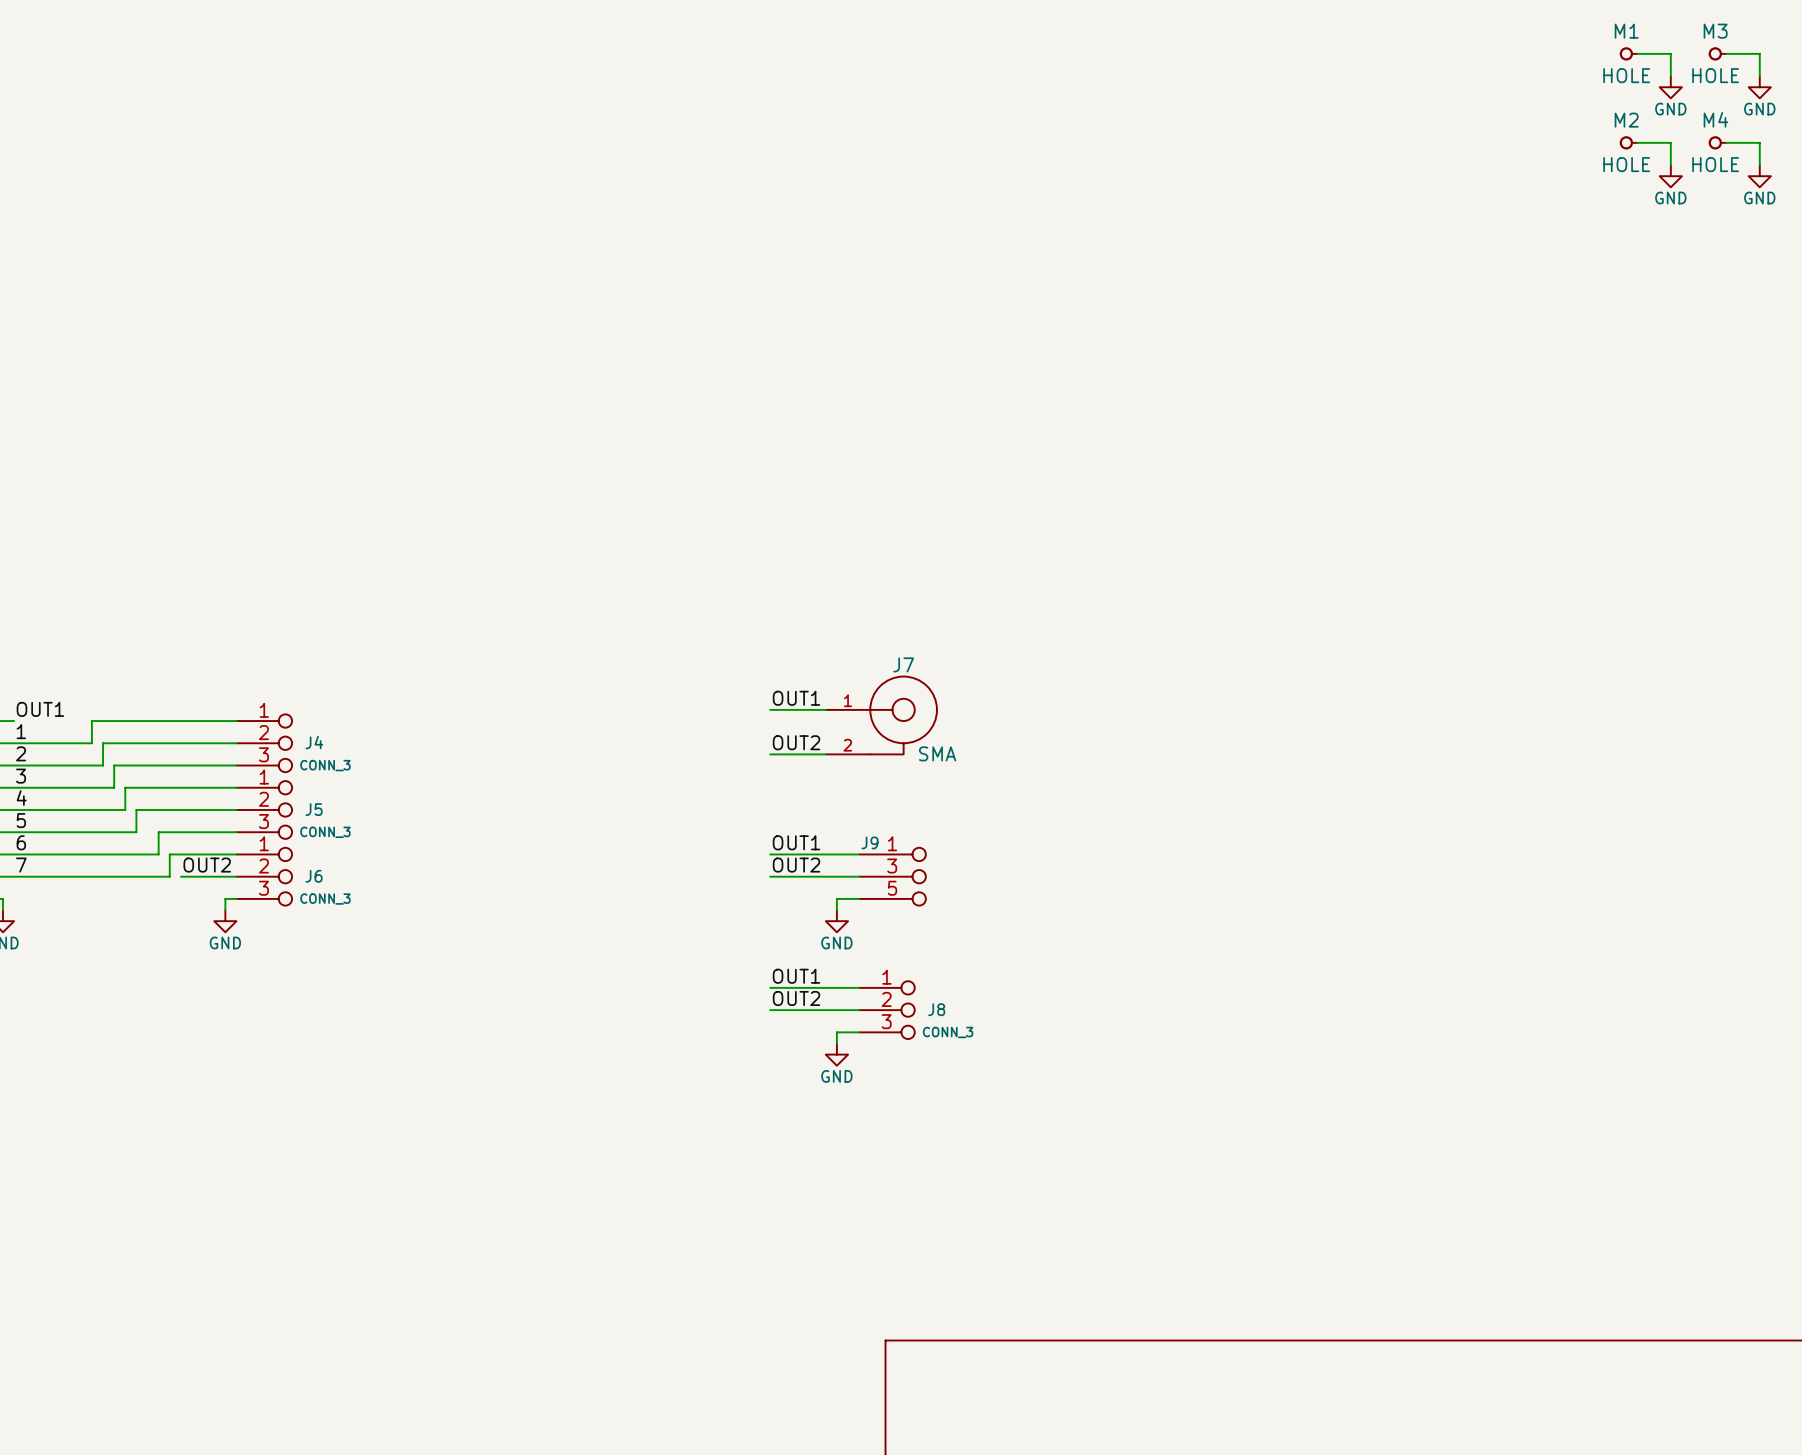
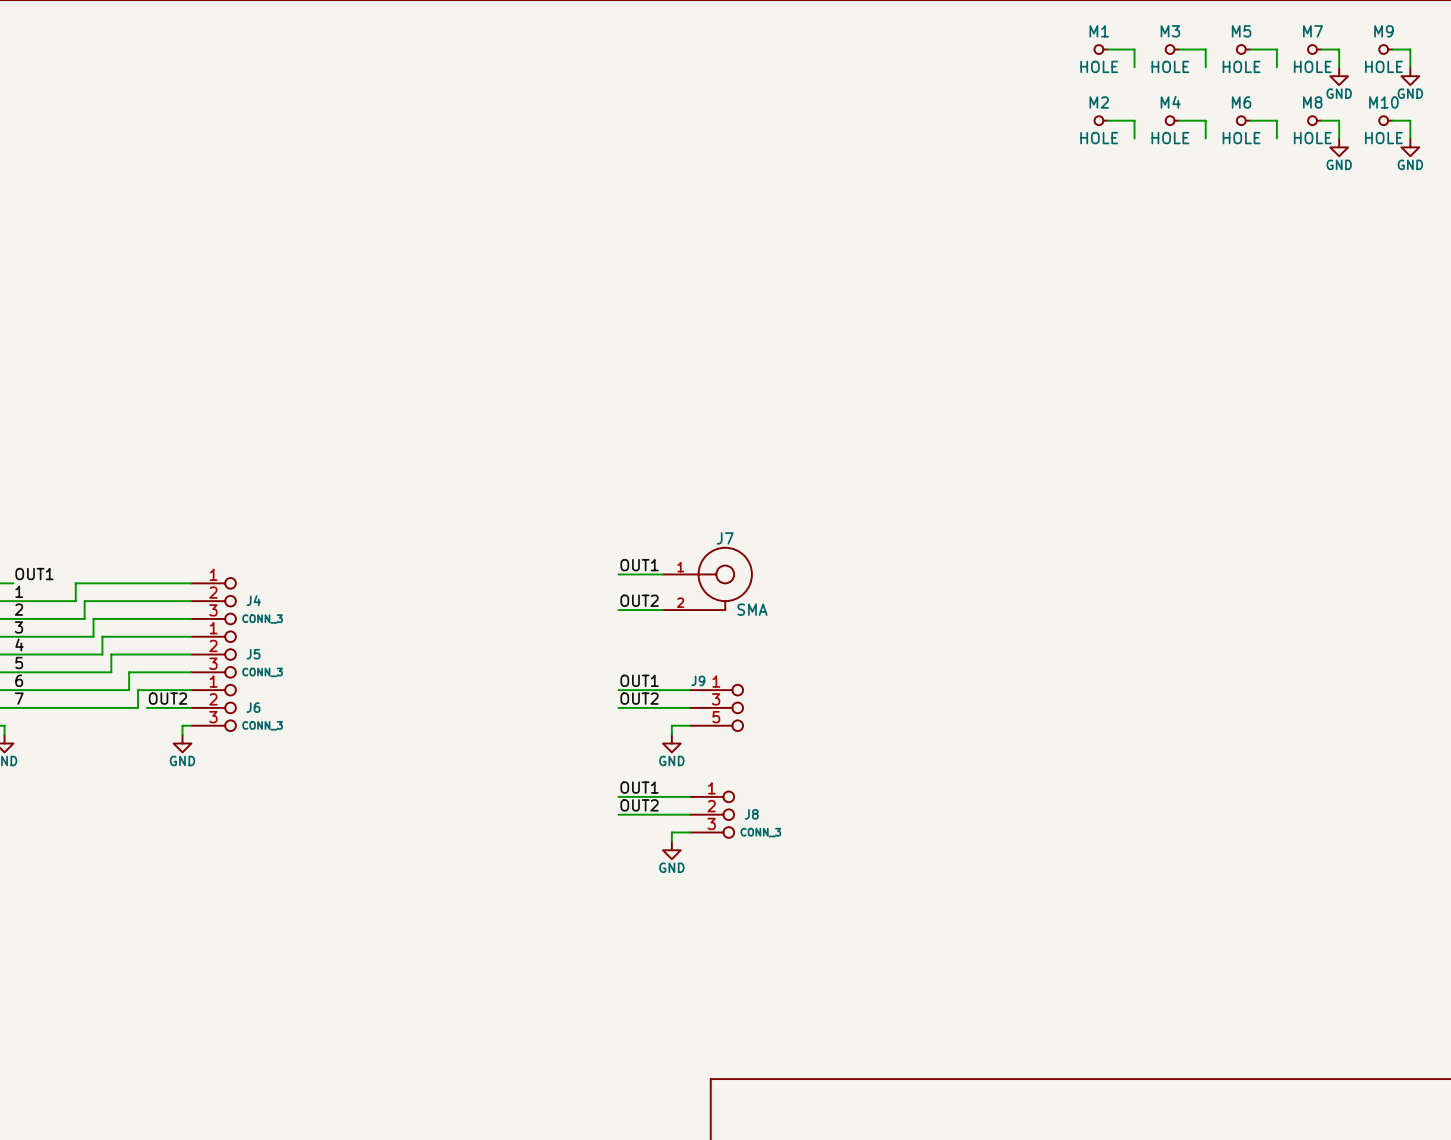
wire: none -> (1107, 49) (1134, 49) (1134, 67)
wire: none -> (1179, 49) (1205, 49) (1205, 67)
M5: none -> HOLE (1243, 49)
wire: none -> (1250, 49) (1276, 49) (1276, 67)
M1 position: (1628, 53) -> (1100, 49)
M7: none -> HOLE (1314, 49)
M3 position: (1717, 53) -> (1171, 49)
M9: none -> HOLE (1385, 49)
wire: none -> (1107, 120) (1134, 120) (1134, 138)
wire: none -> (1179, 120) (1205, 120) (1205, 138)
M6: none -> HOLE (1243, 120)
wire: none -> (1250, 120) (1276, 120) (1276, 138)
M2 position: (1628, 142) -> (1100, 120)
M8: none -> HOLE (1314, 120)
M4 position: (1717, 142) -> (1171, 120)
M10: none -> HOLE (1385, 120)

